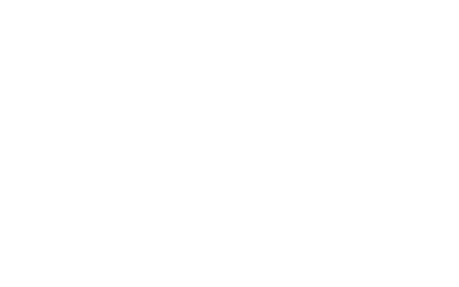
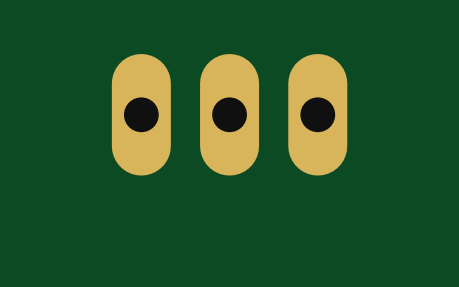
part: none -> (229, 114)

